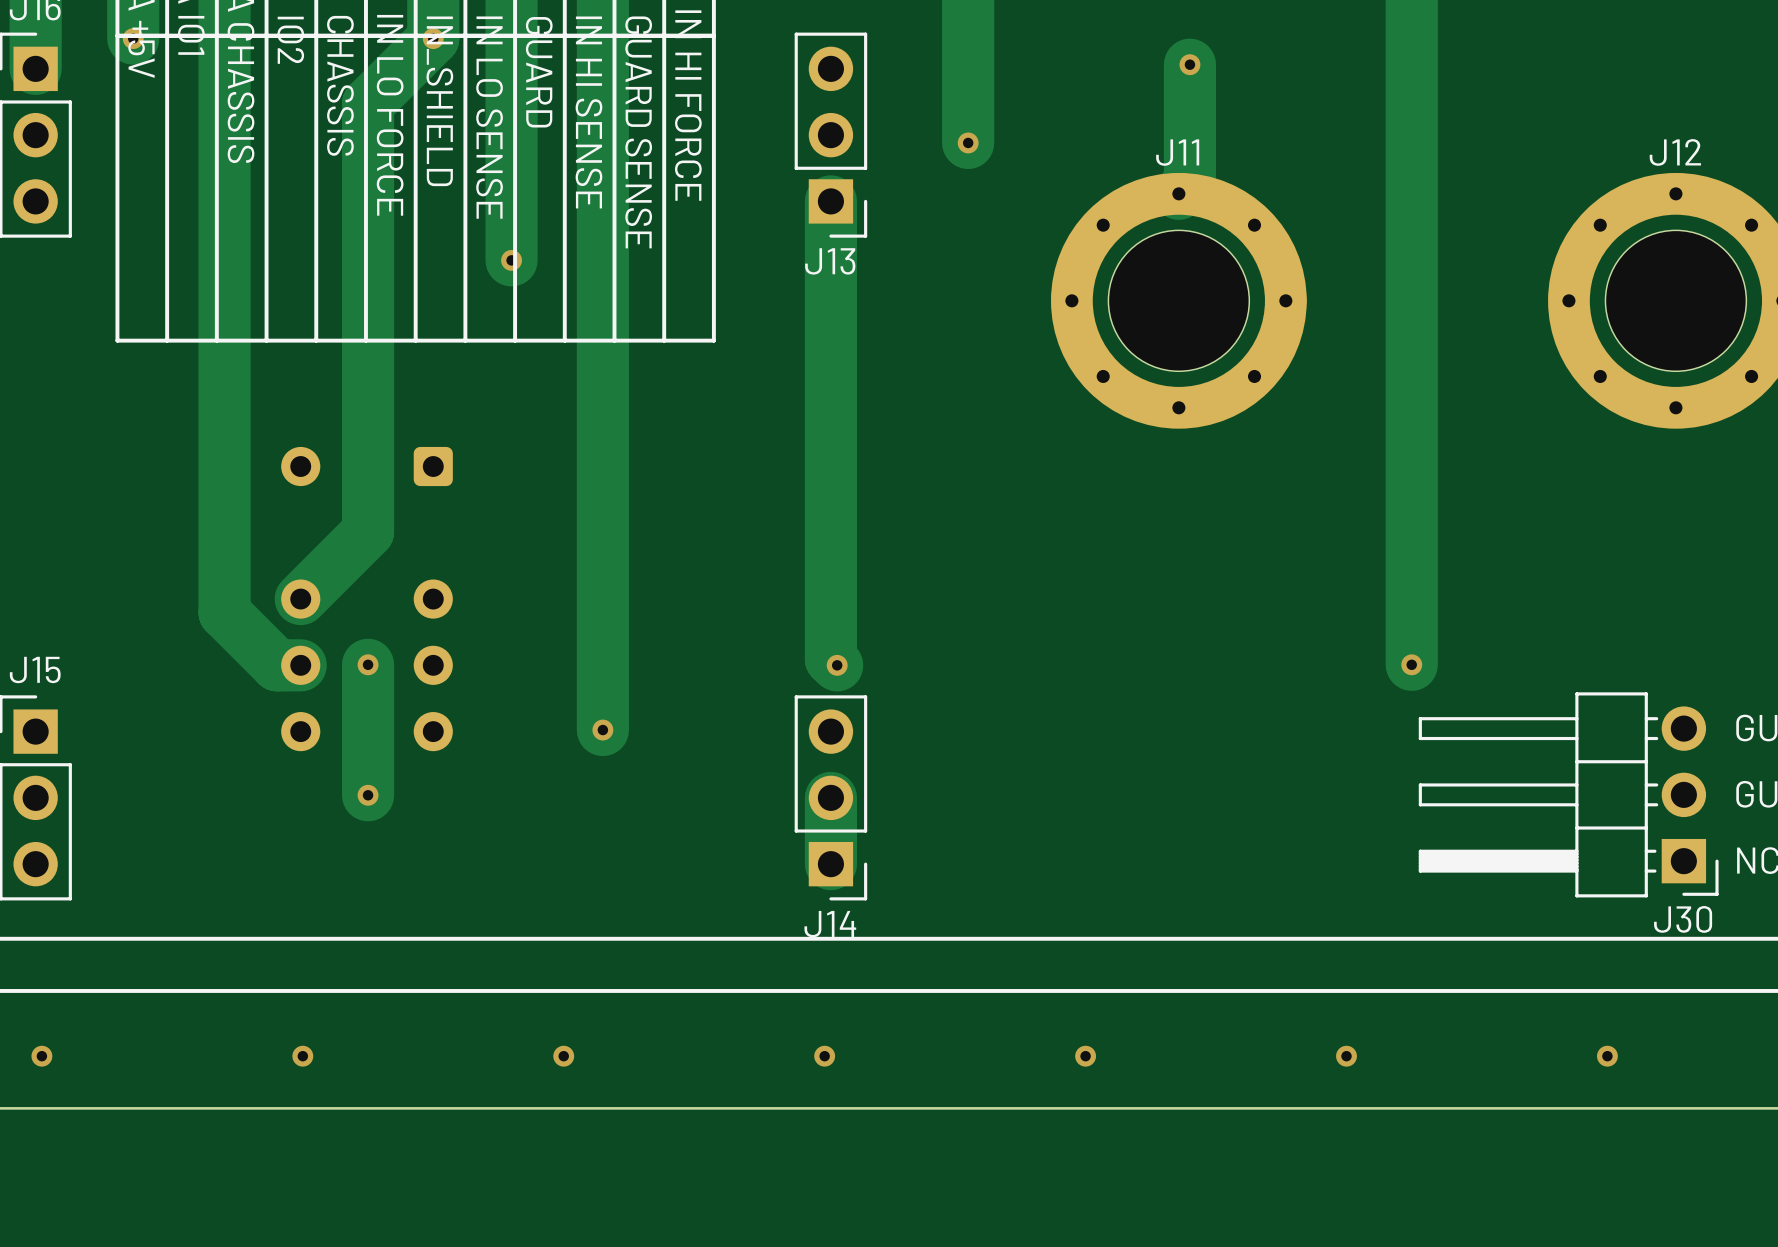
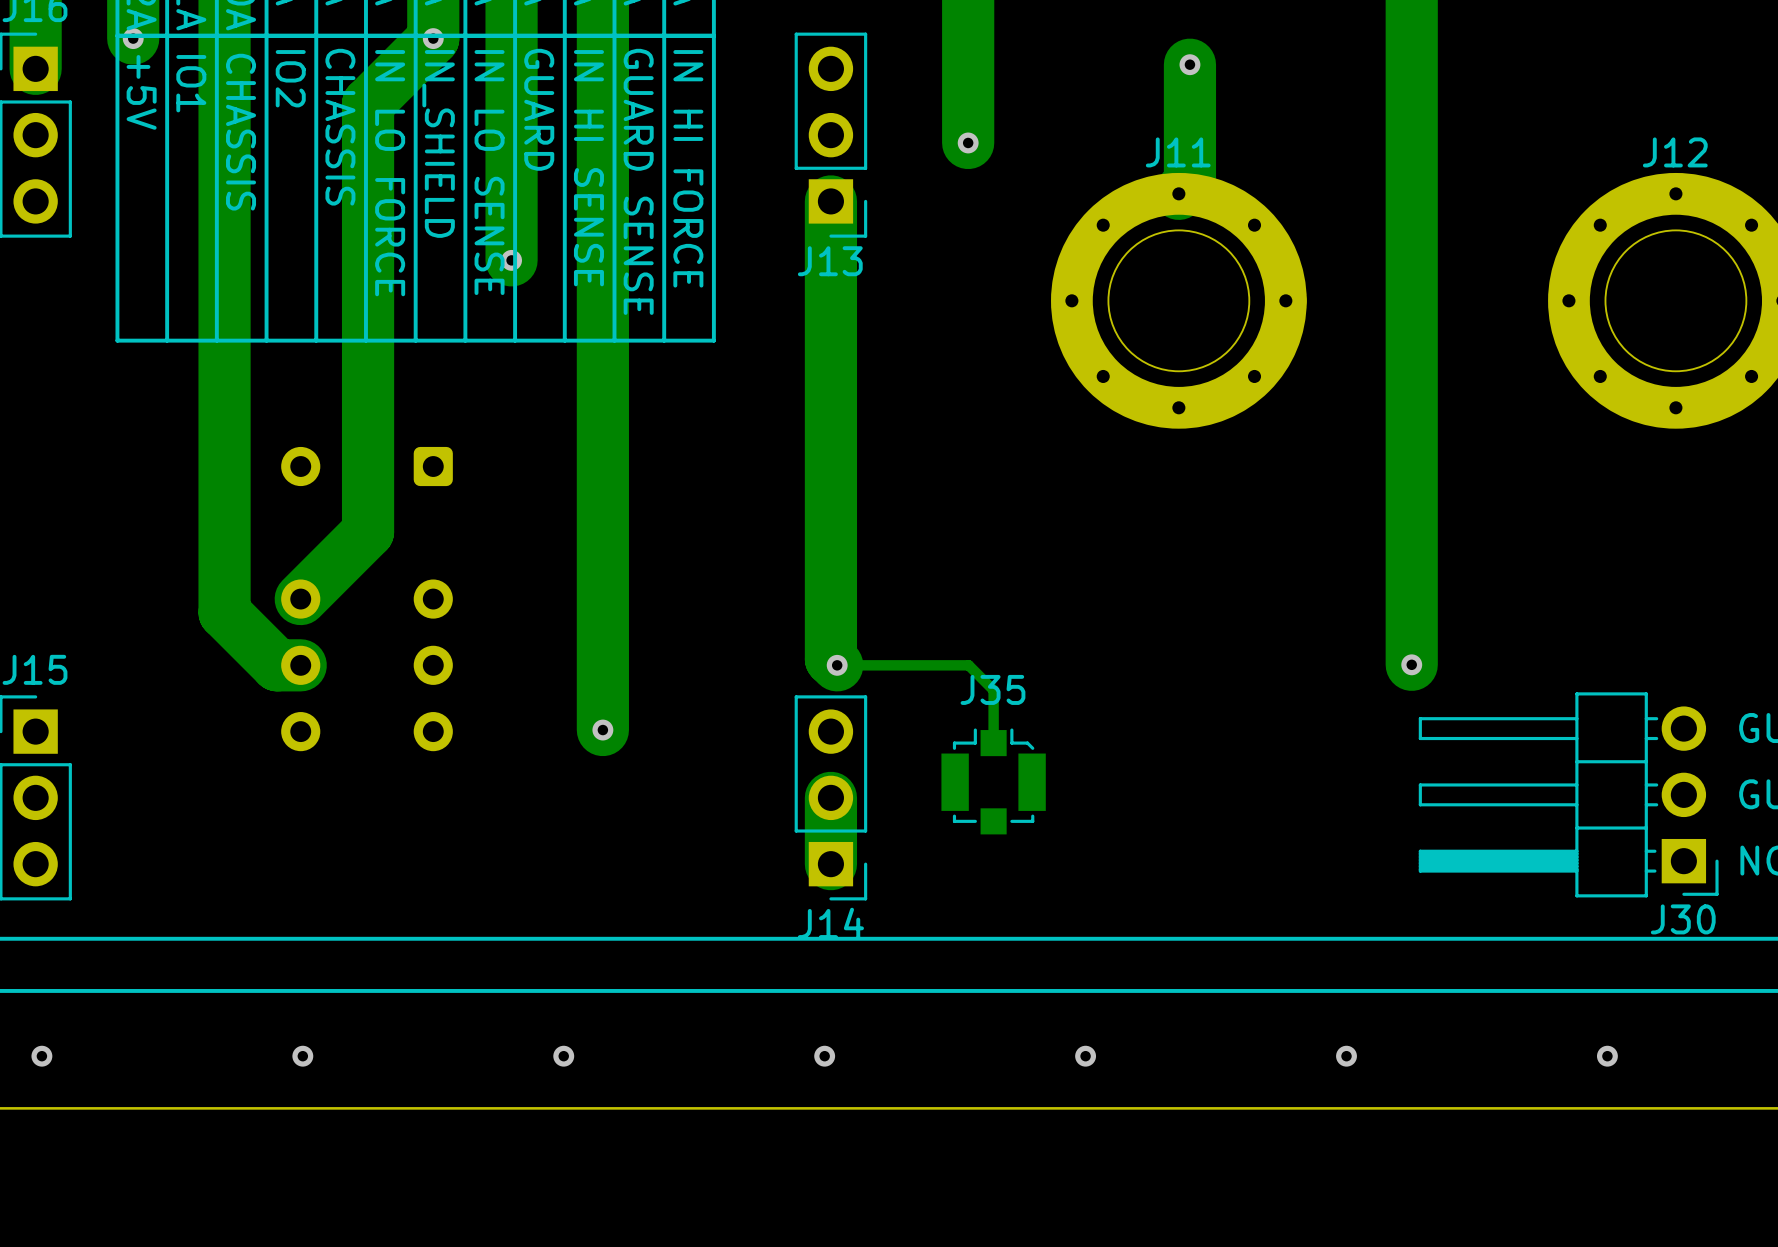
track: (368, 664) (368, 795) -> none
via: (368, 664) -> none
track: none -> (837, 665) (968, 665) (993, 690) (993, 743)
J35: none -> (993, 781)
via: (368, 795) -> none

